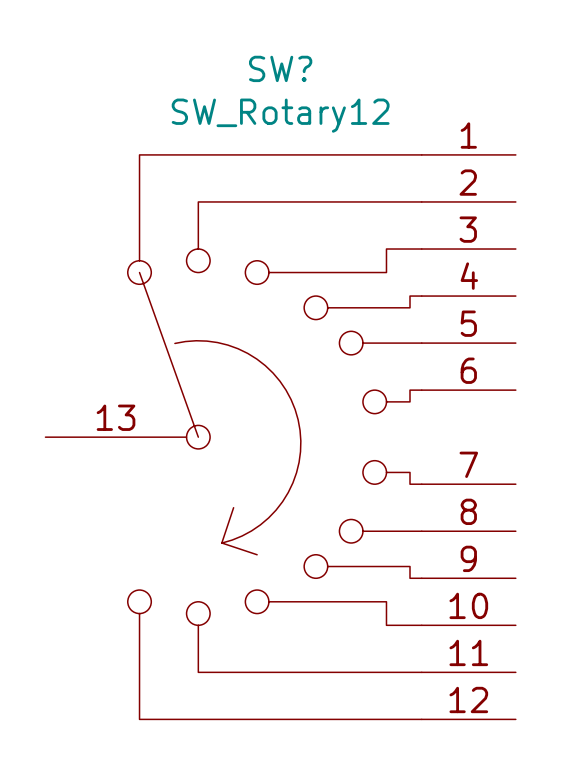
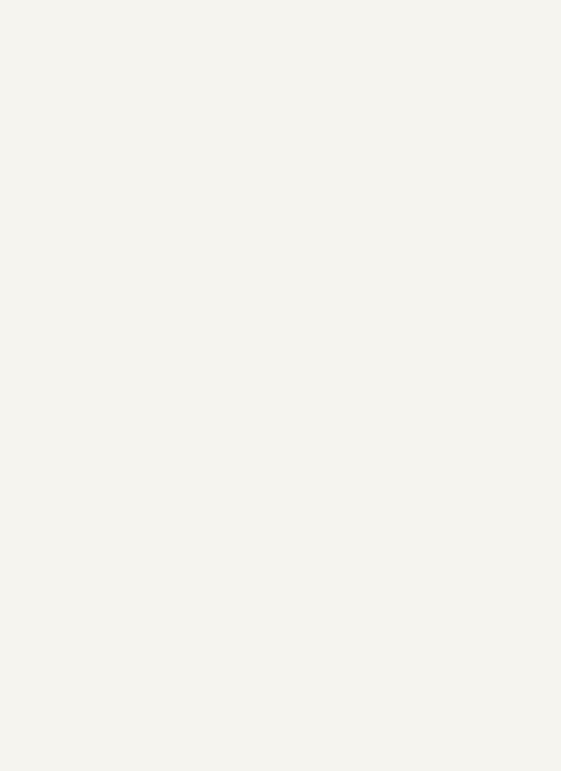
SW?: SW_Rotary12 (280, 437) -> none

